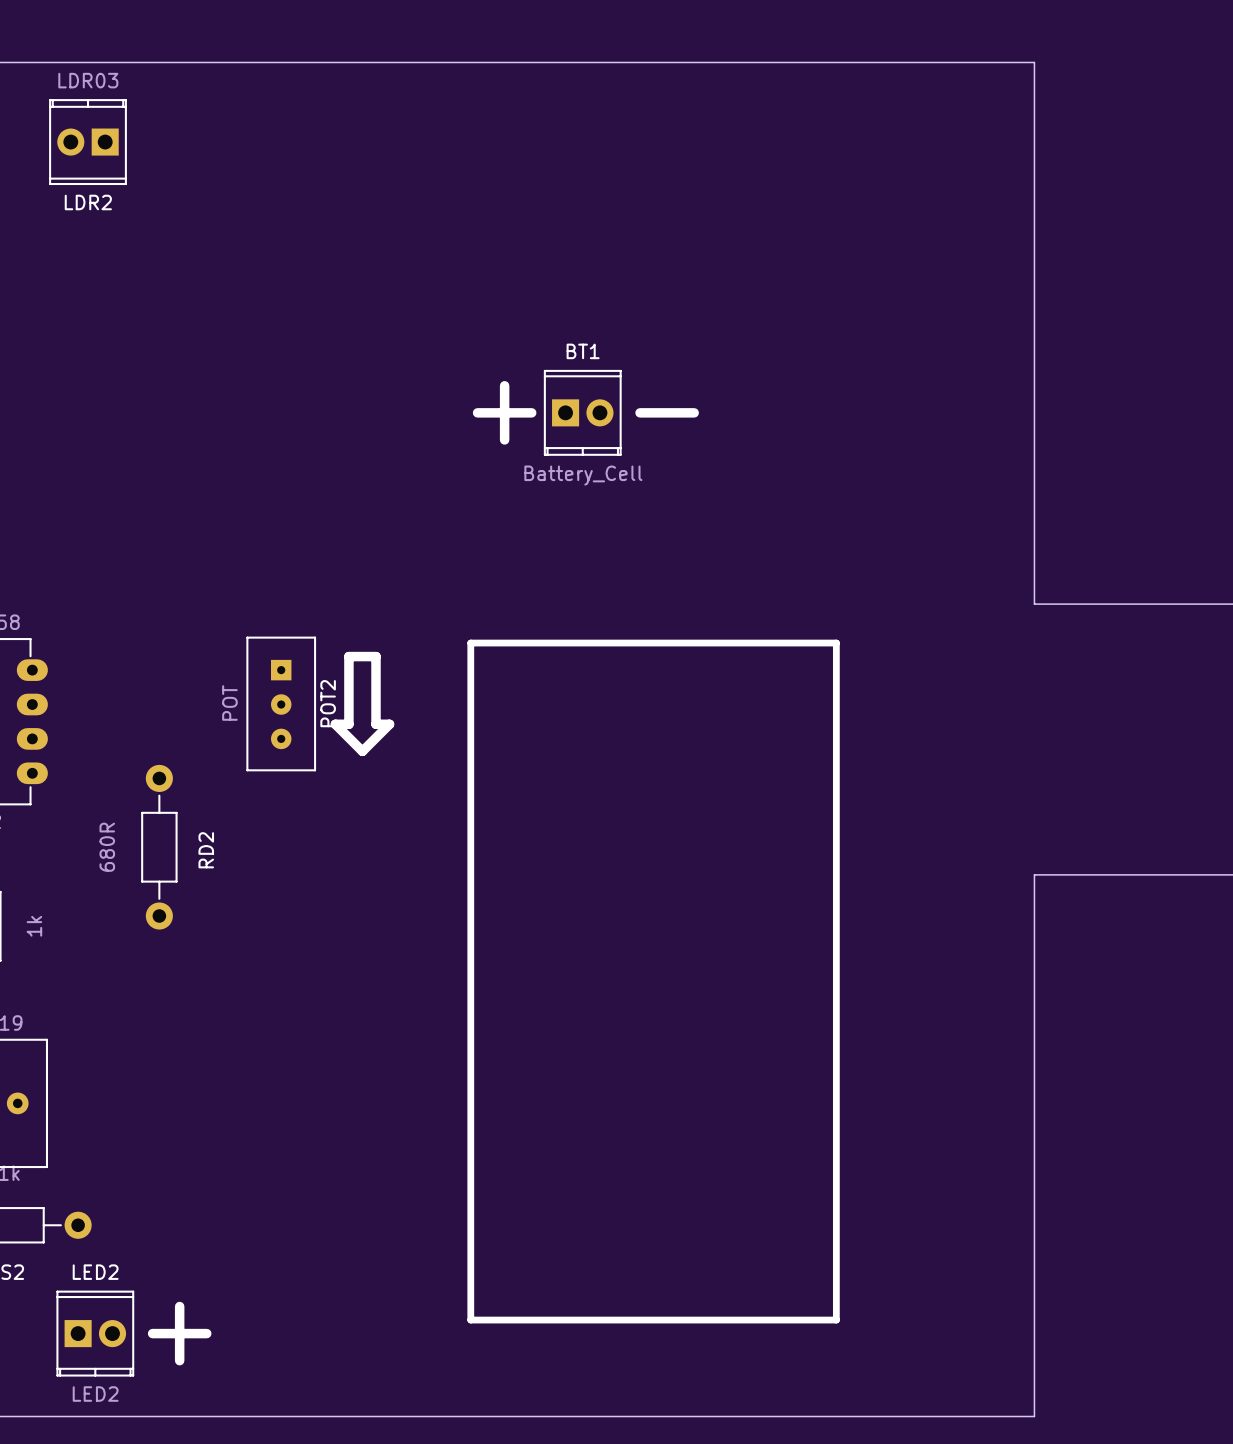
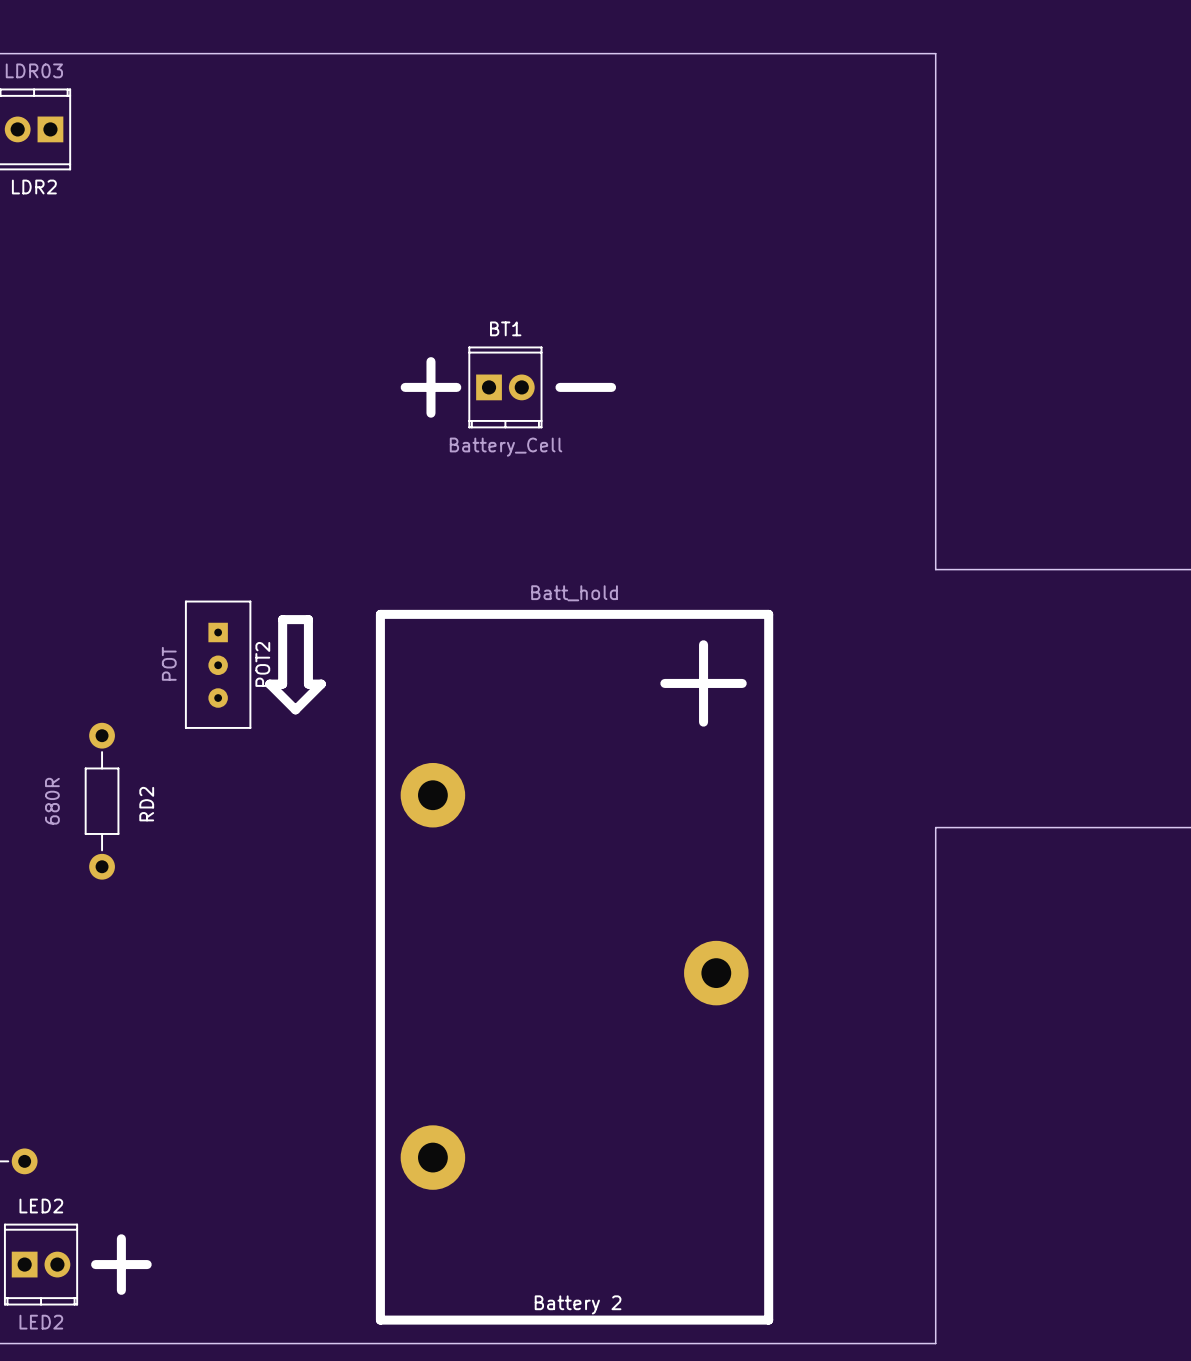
line: (470, 643) (470, 1320) (836, 1320) (836, 643) (470, 643) -> none
Battery 2: none -> Batt_hold (574, 967)

